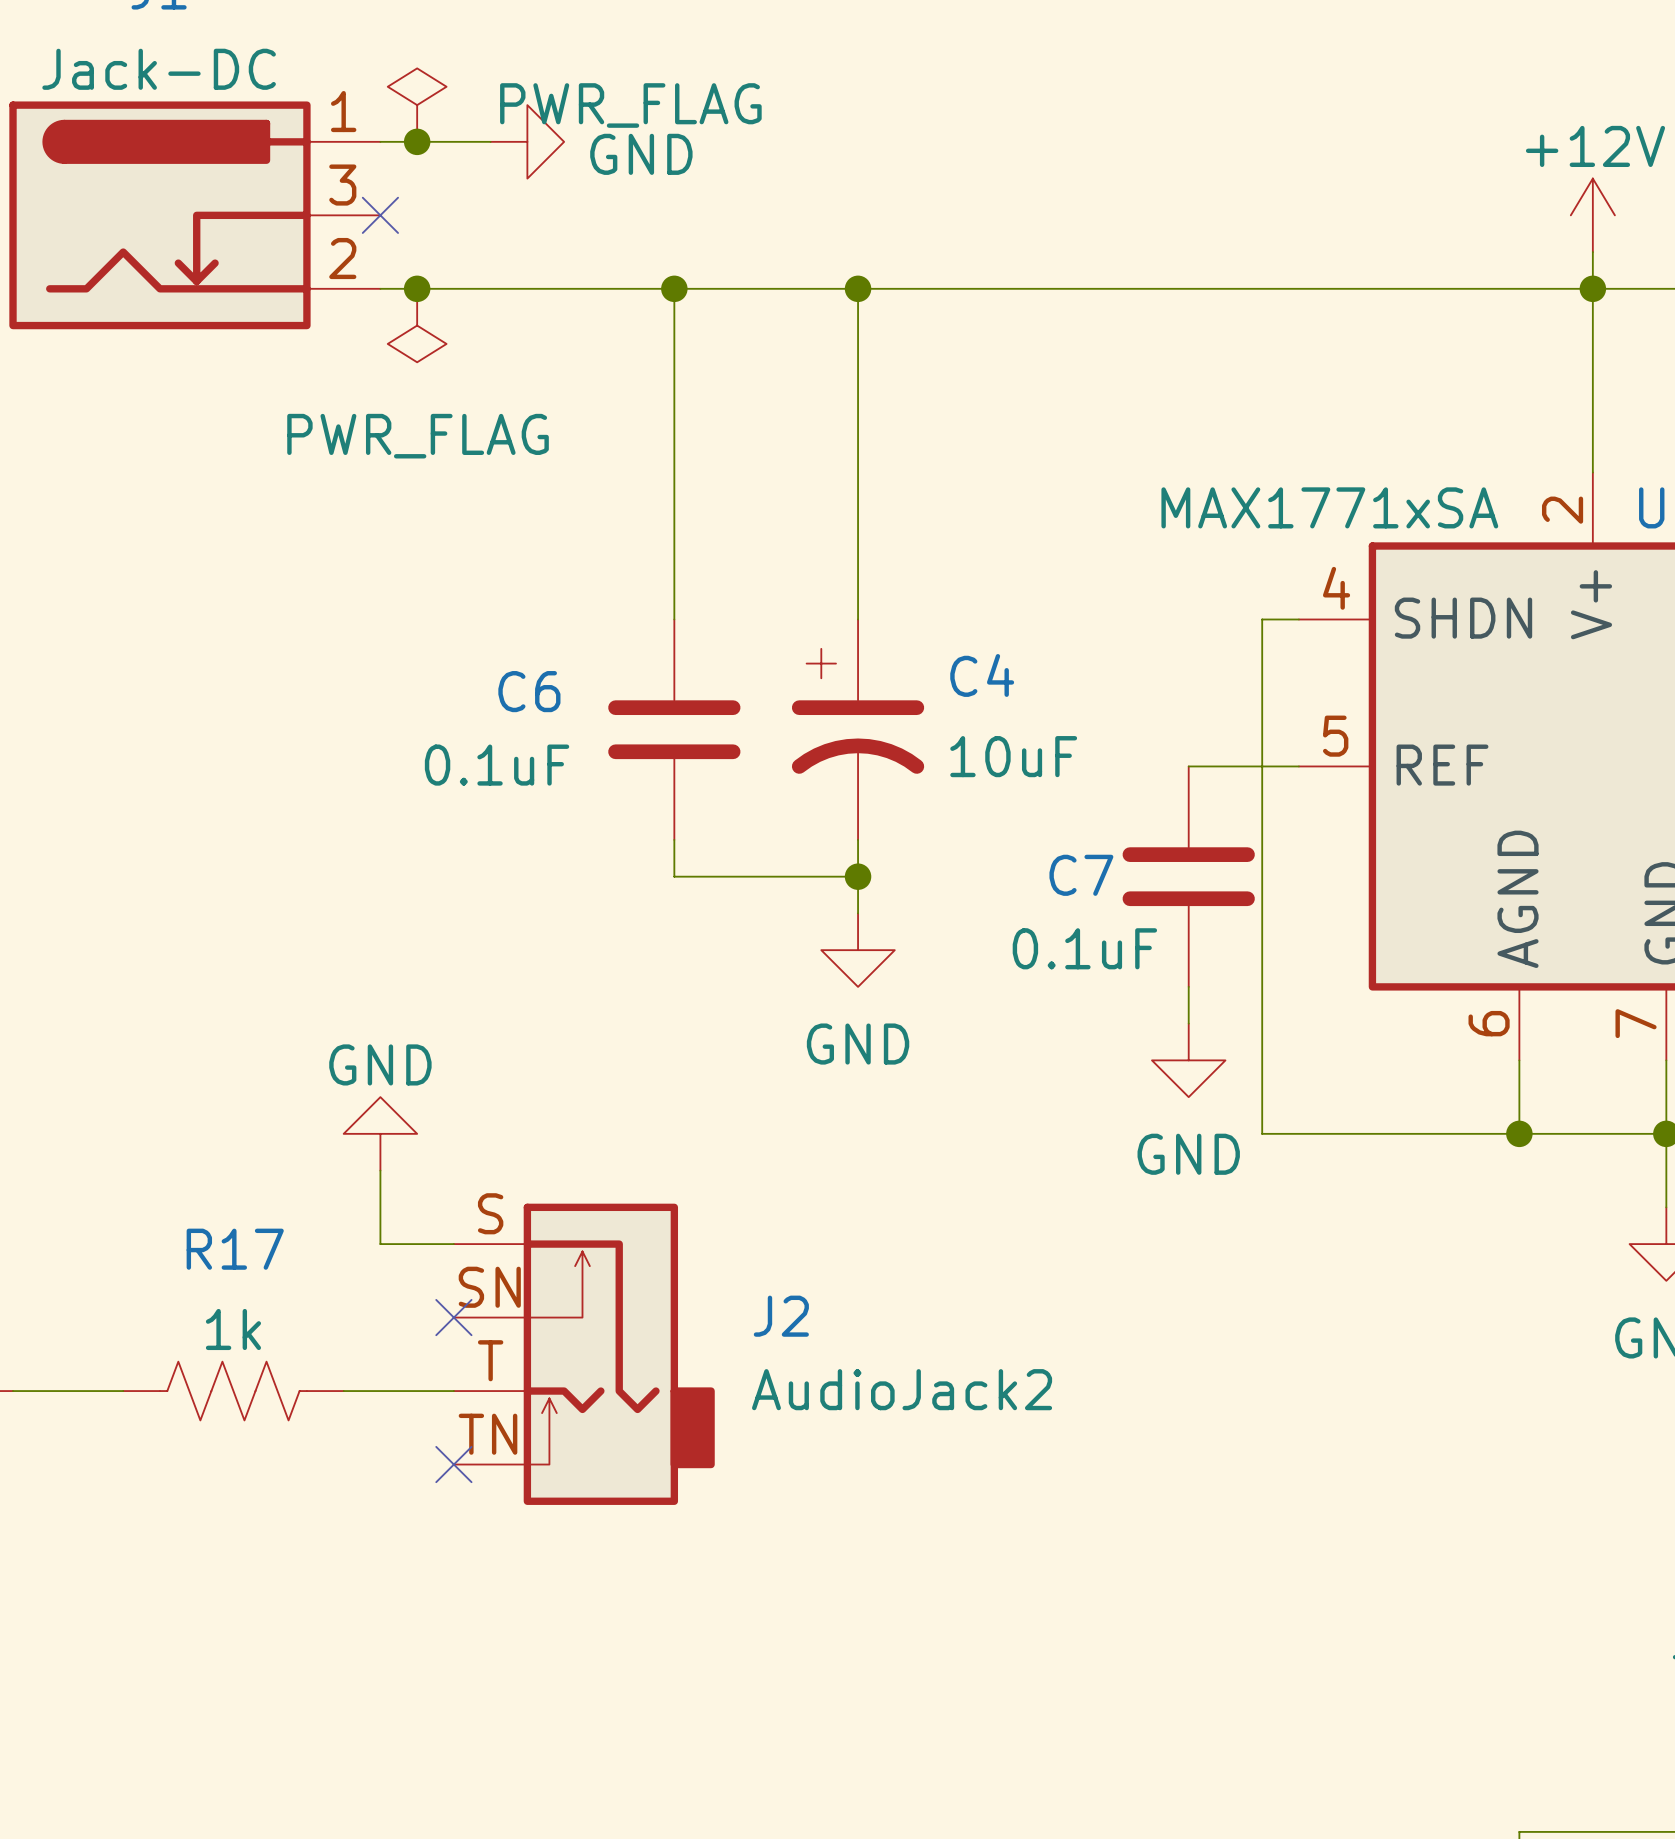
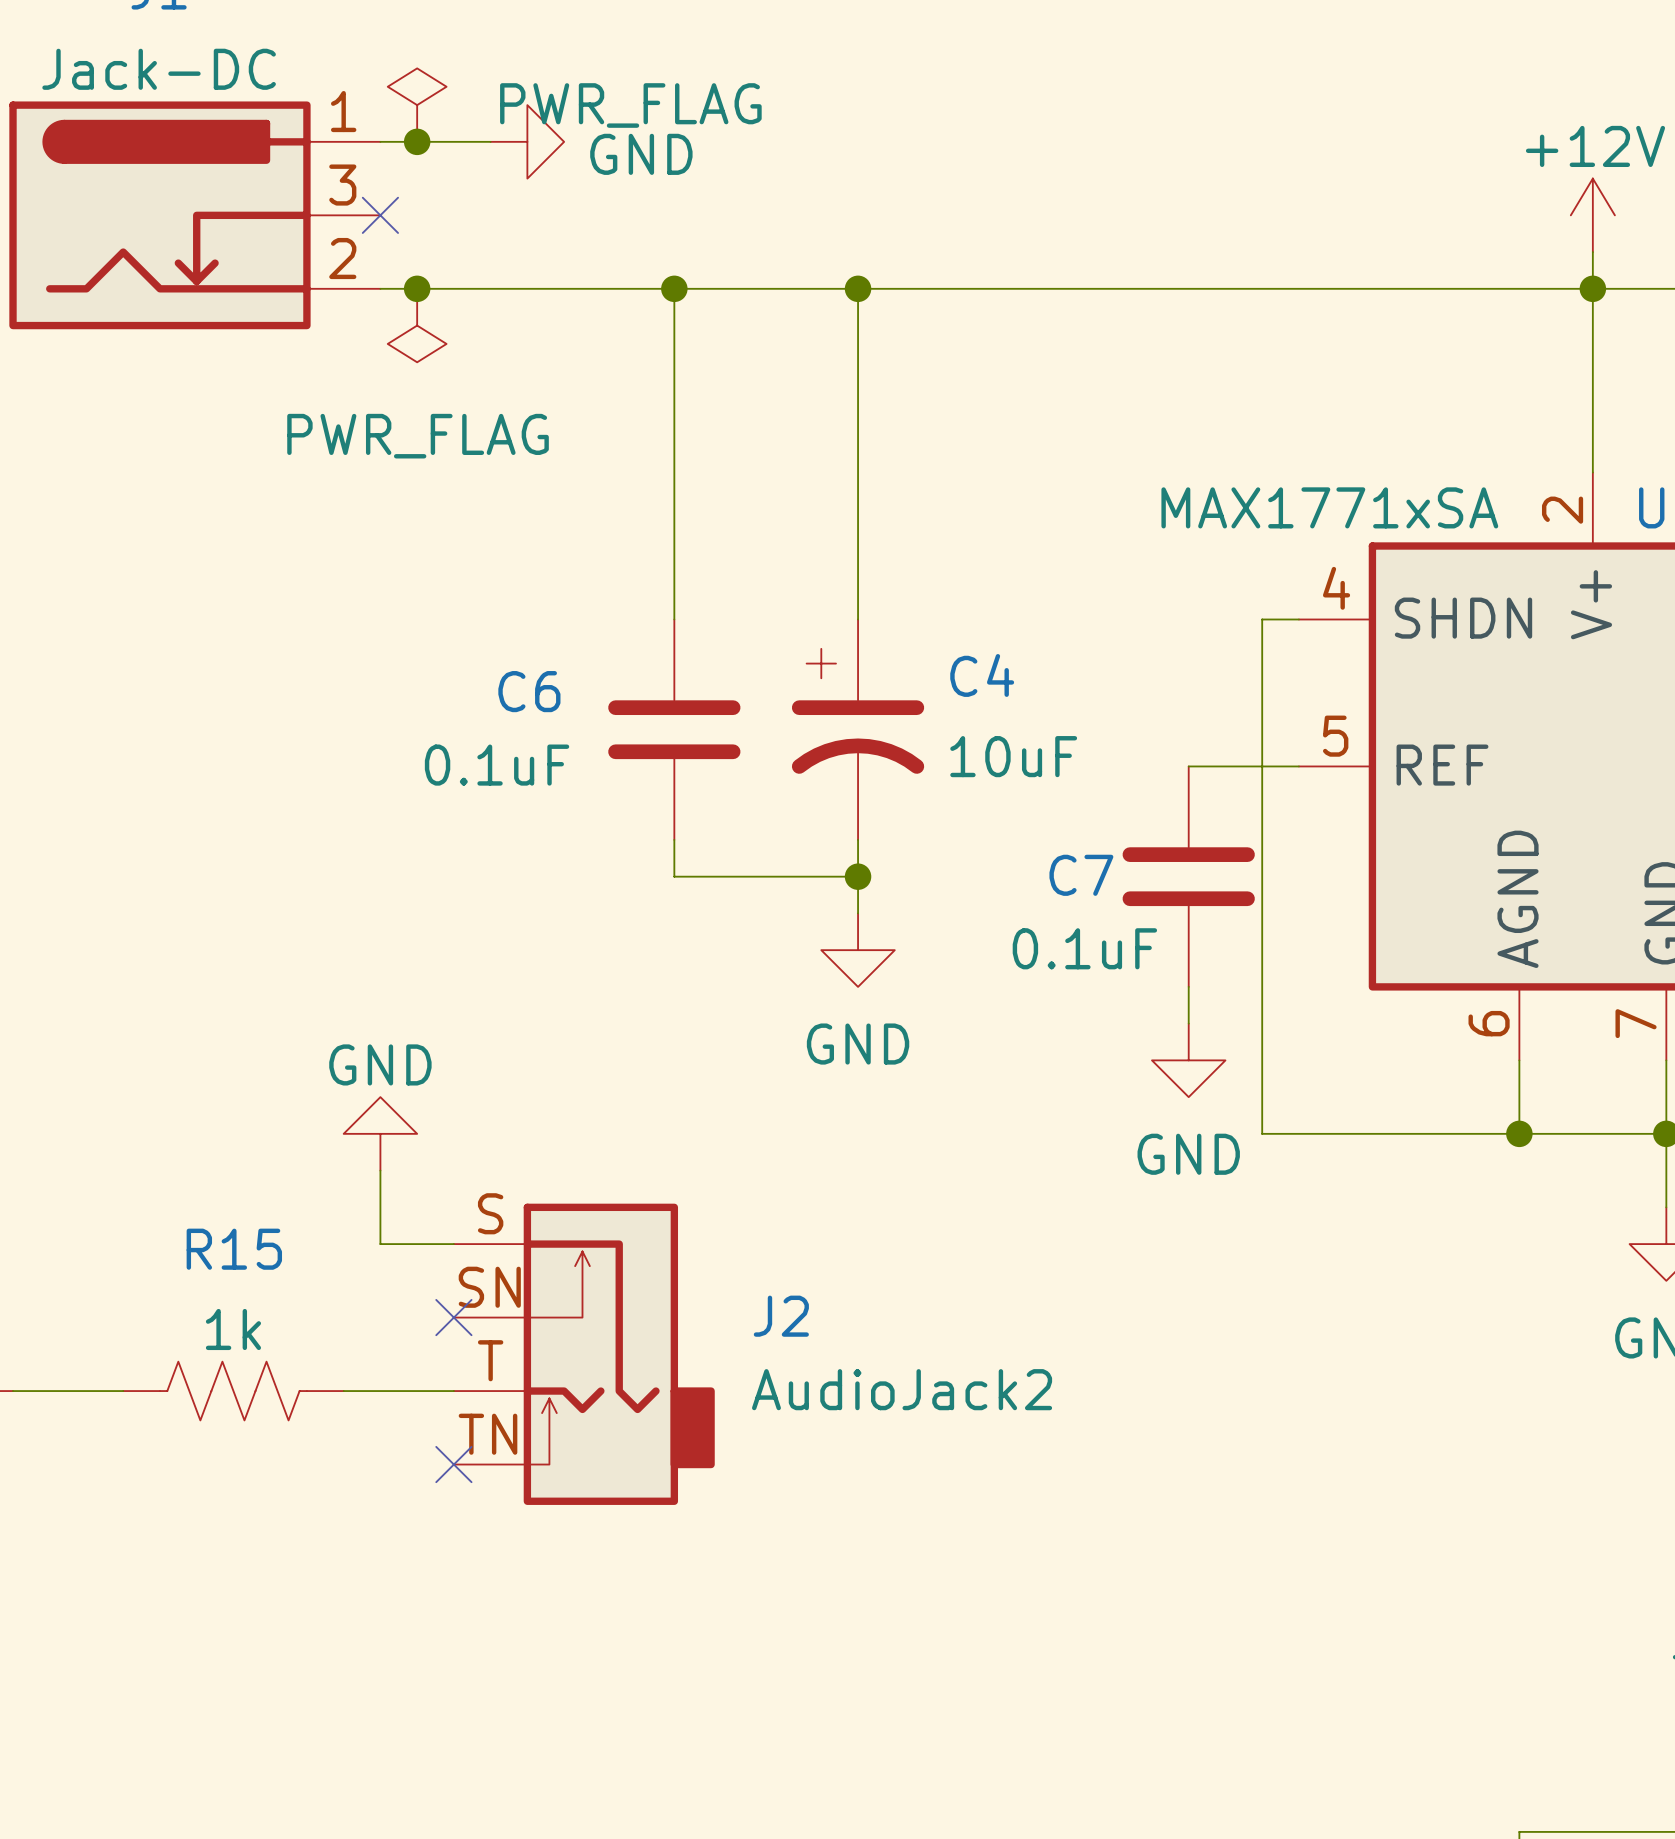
R17 name: R17 (235, 1249) -> R15 (234, 1249)

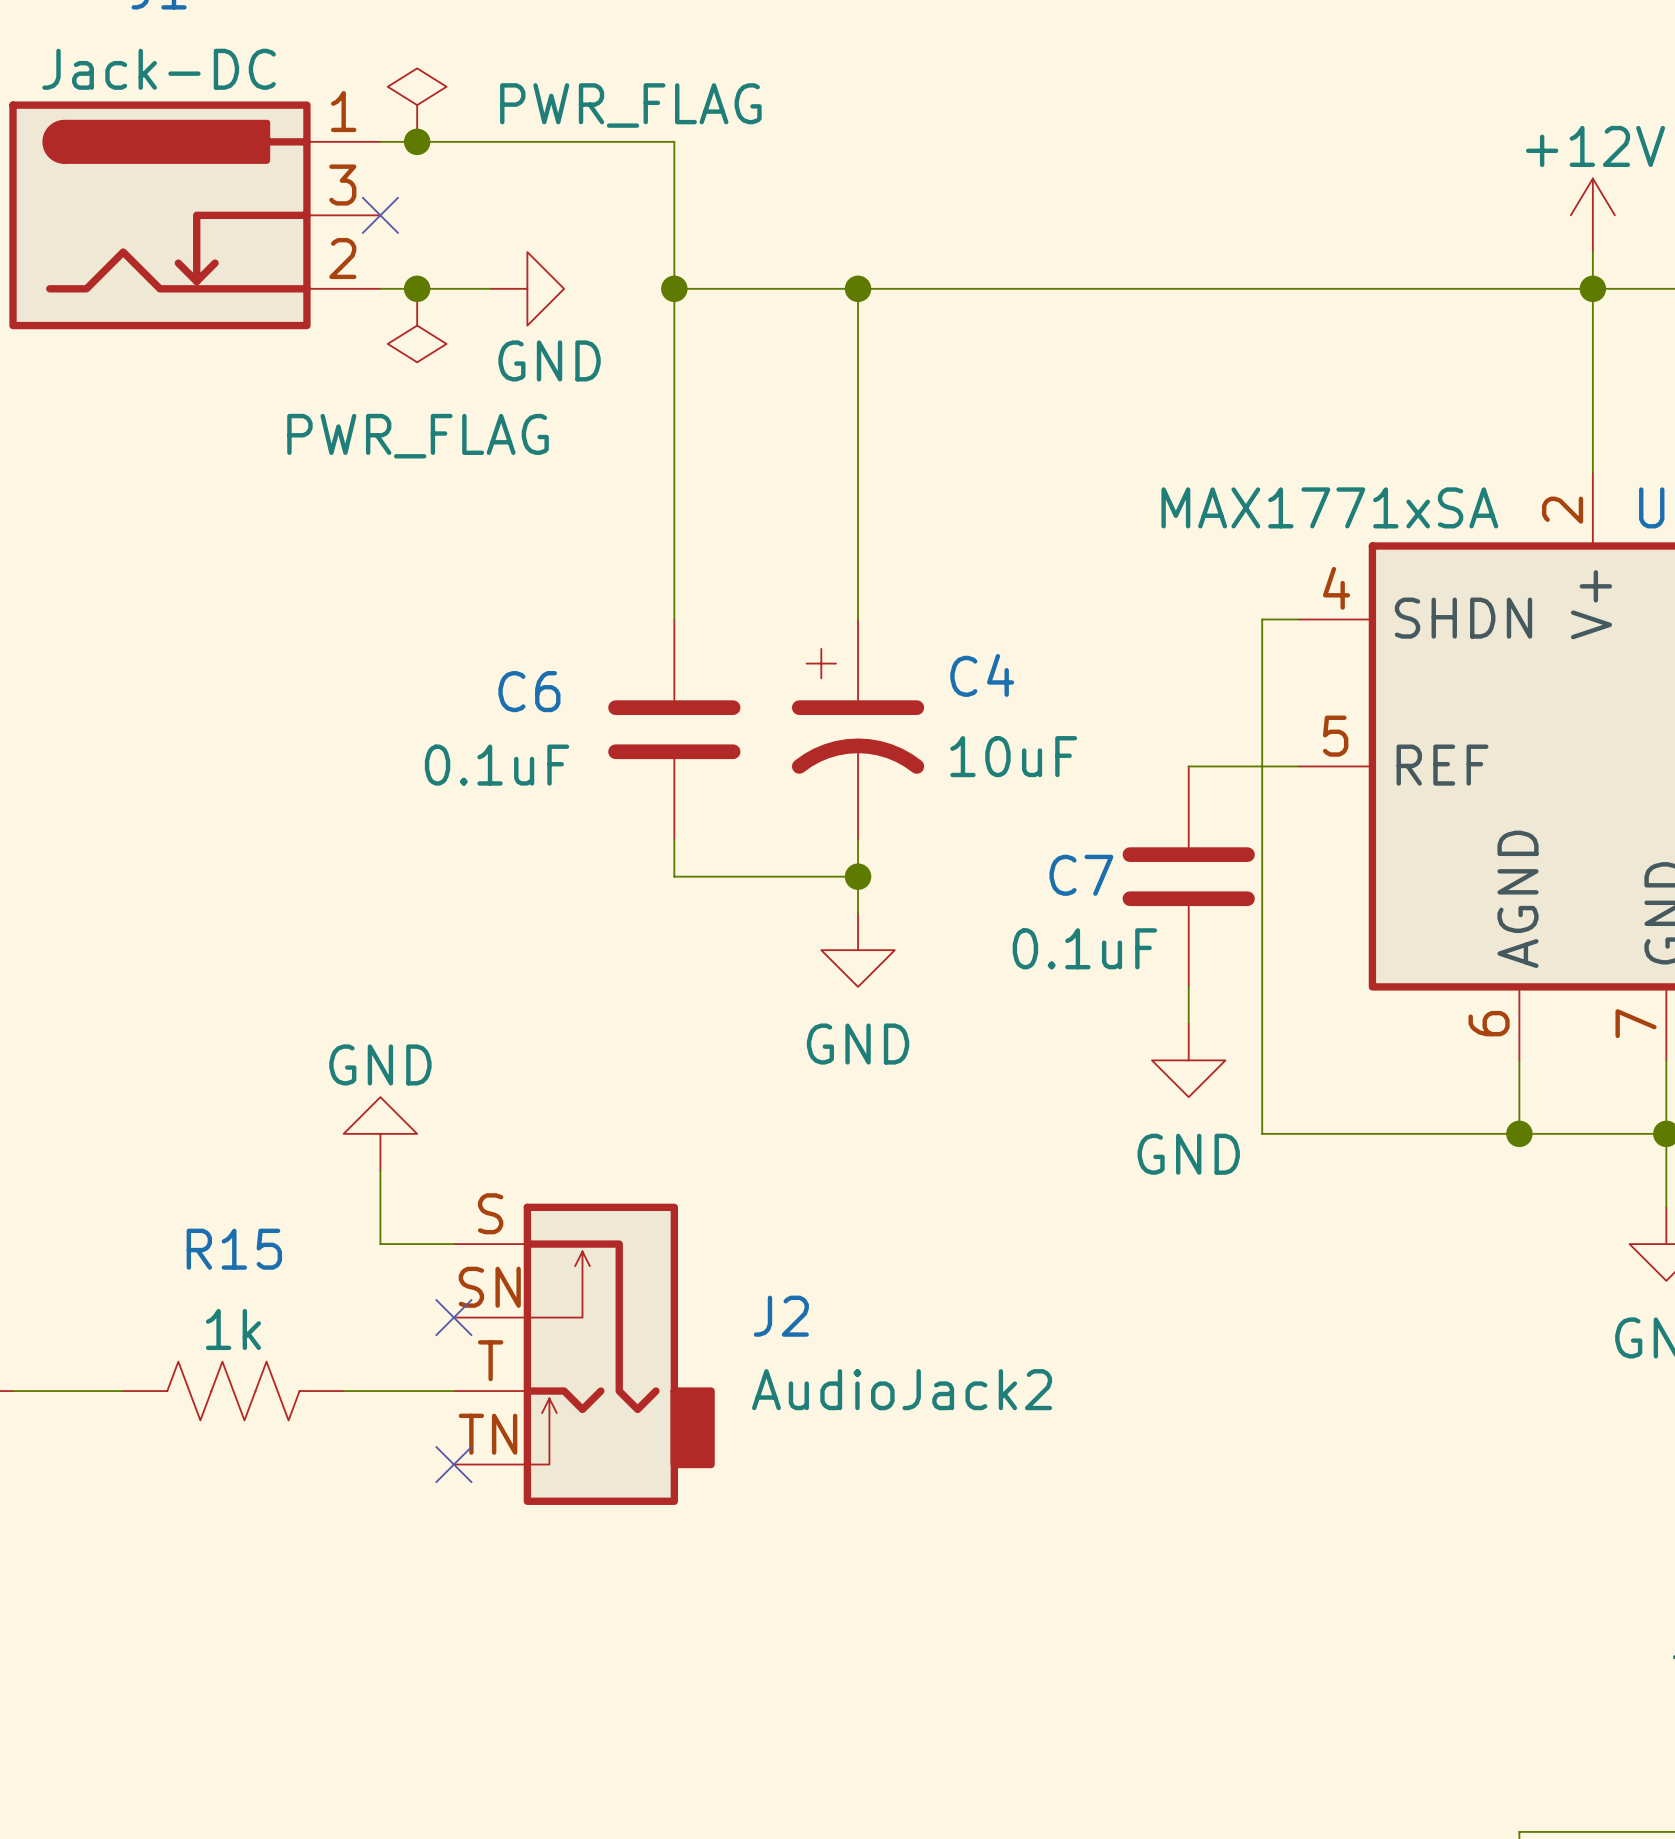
power symbol position: GND (527, 141) -> GND (527, 288)
power symbol text position: GND (641, 154) -> GND (549, 360)
wire: (490, 288) (674, 288) -> (490, 141) (674, 141) (674, 288)

